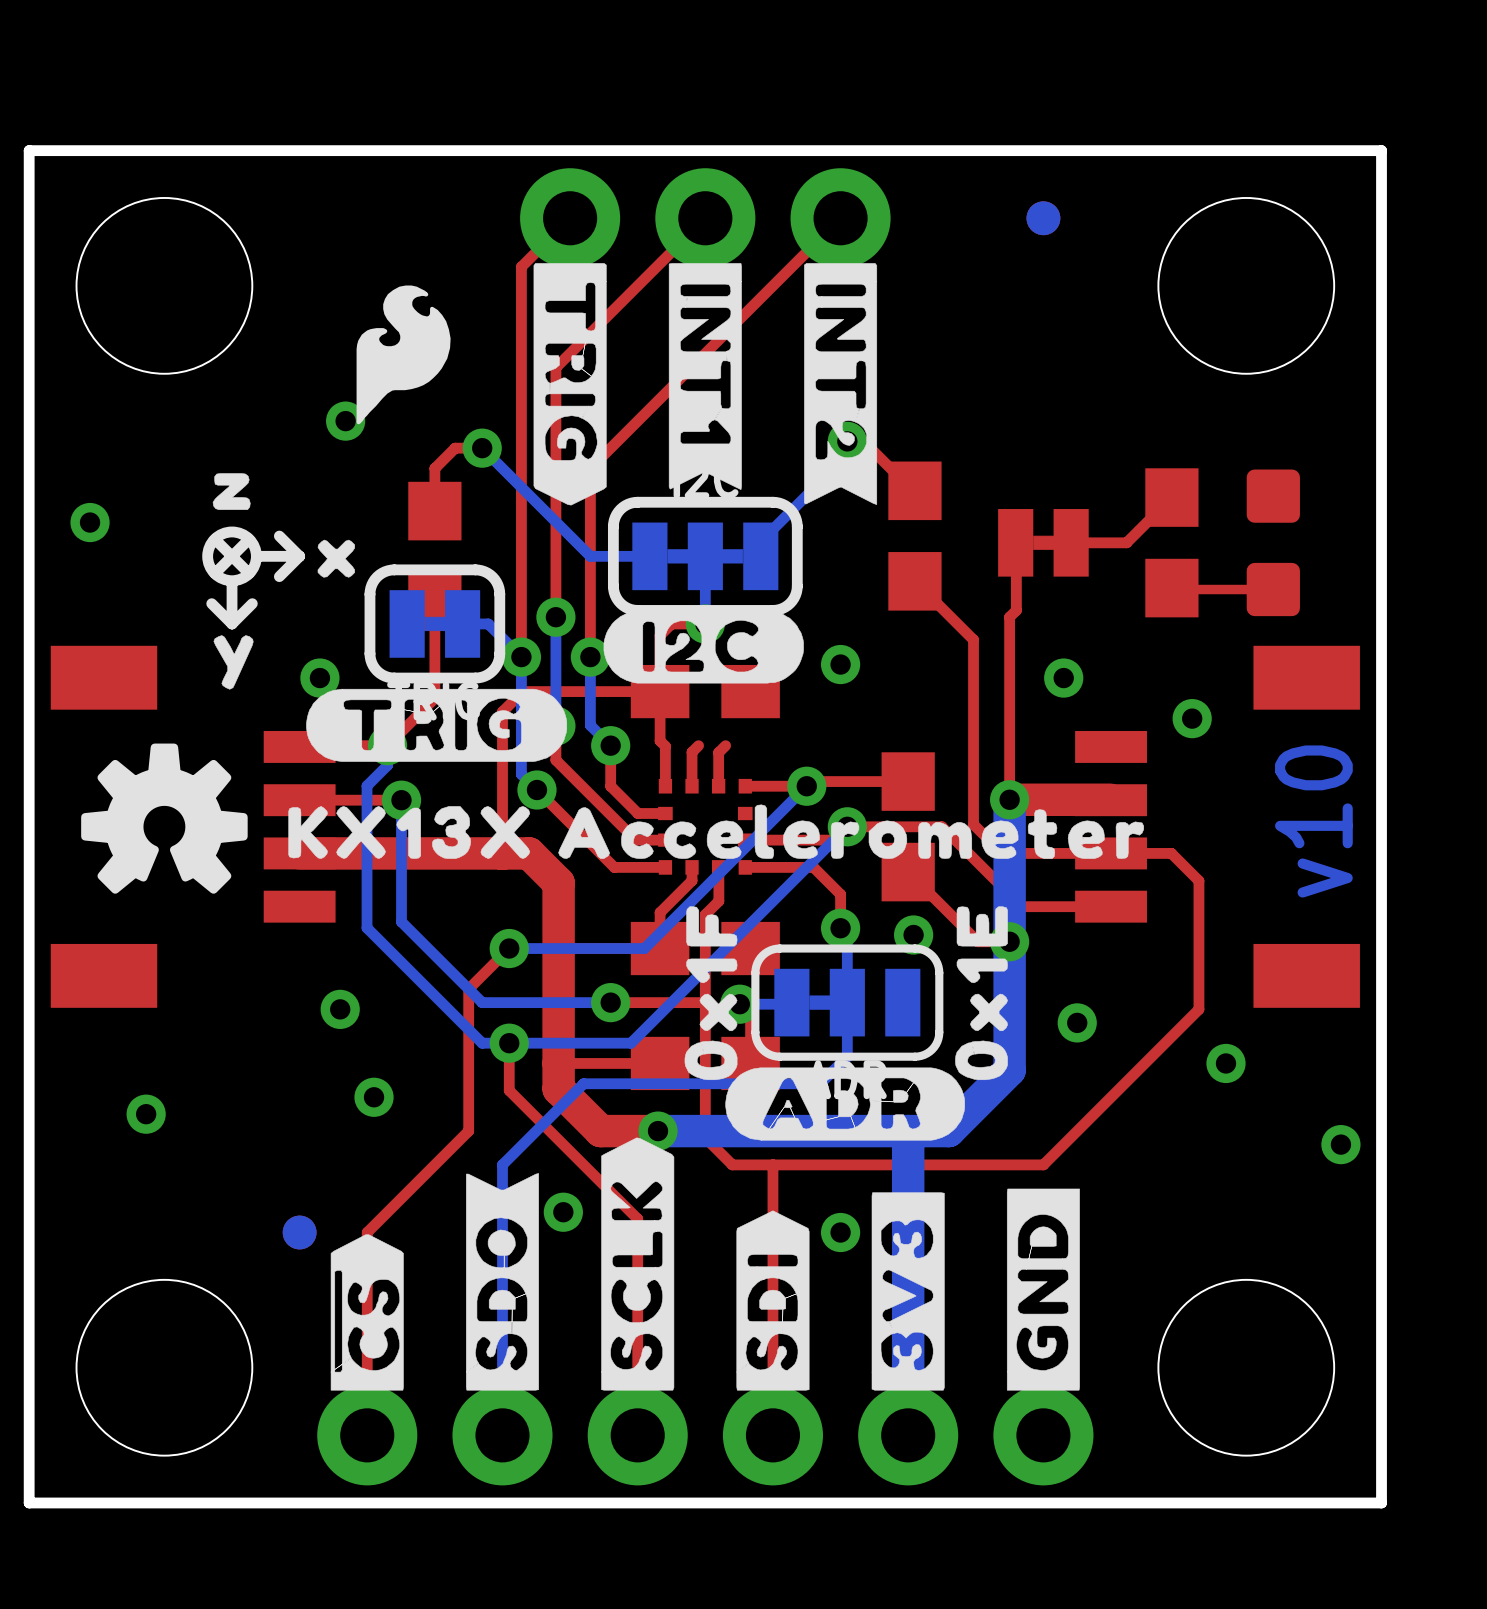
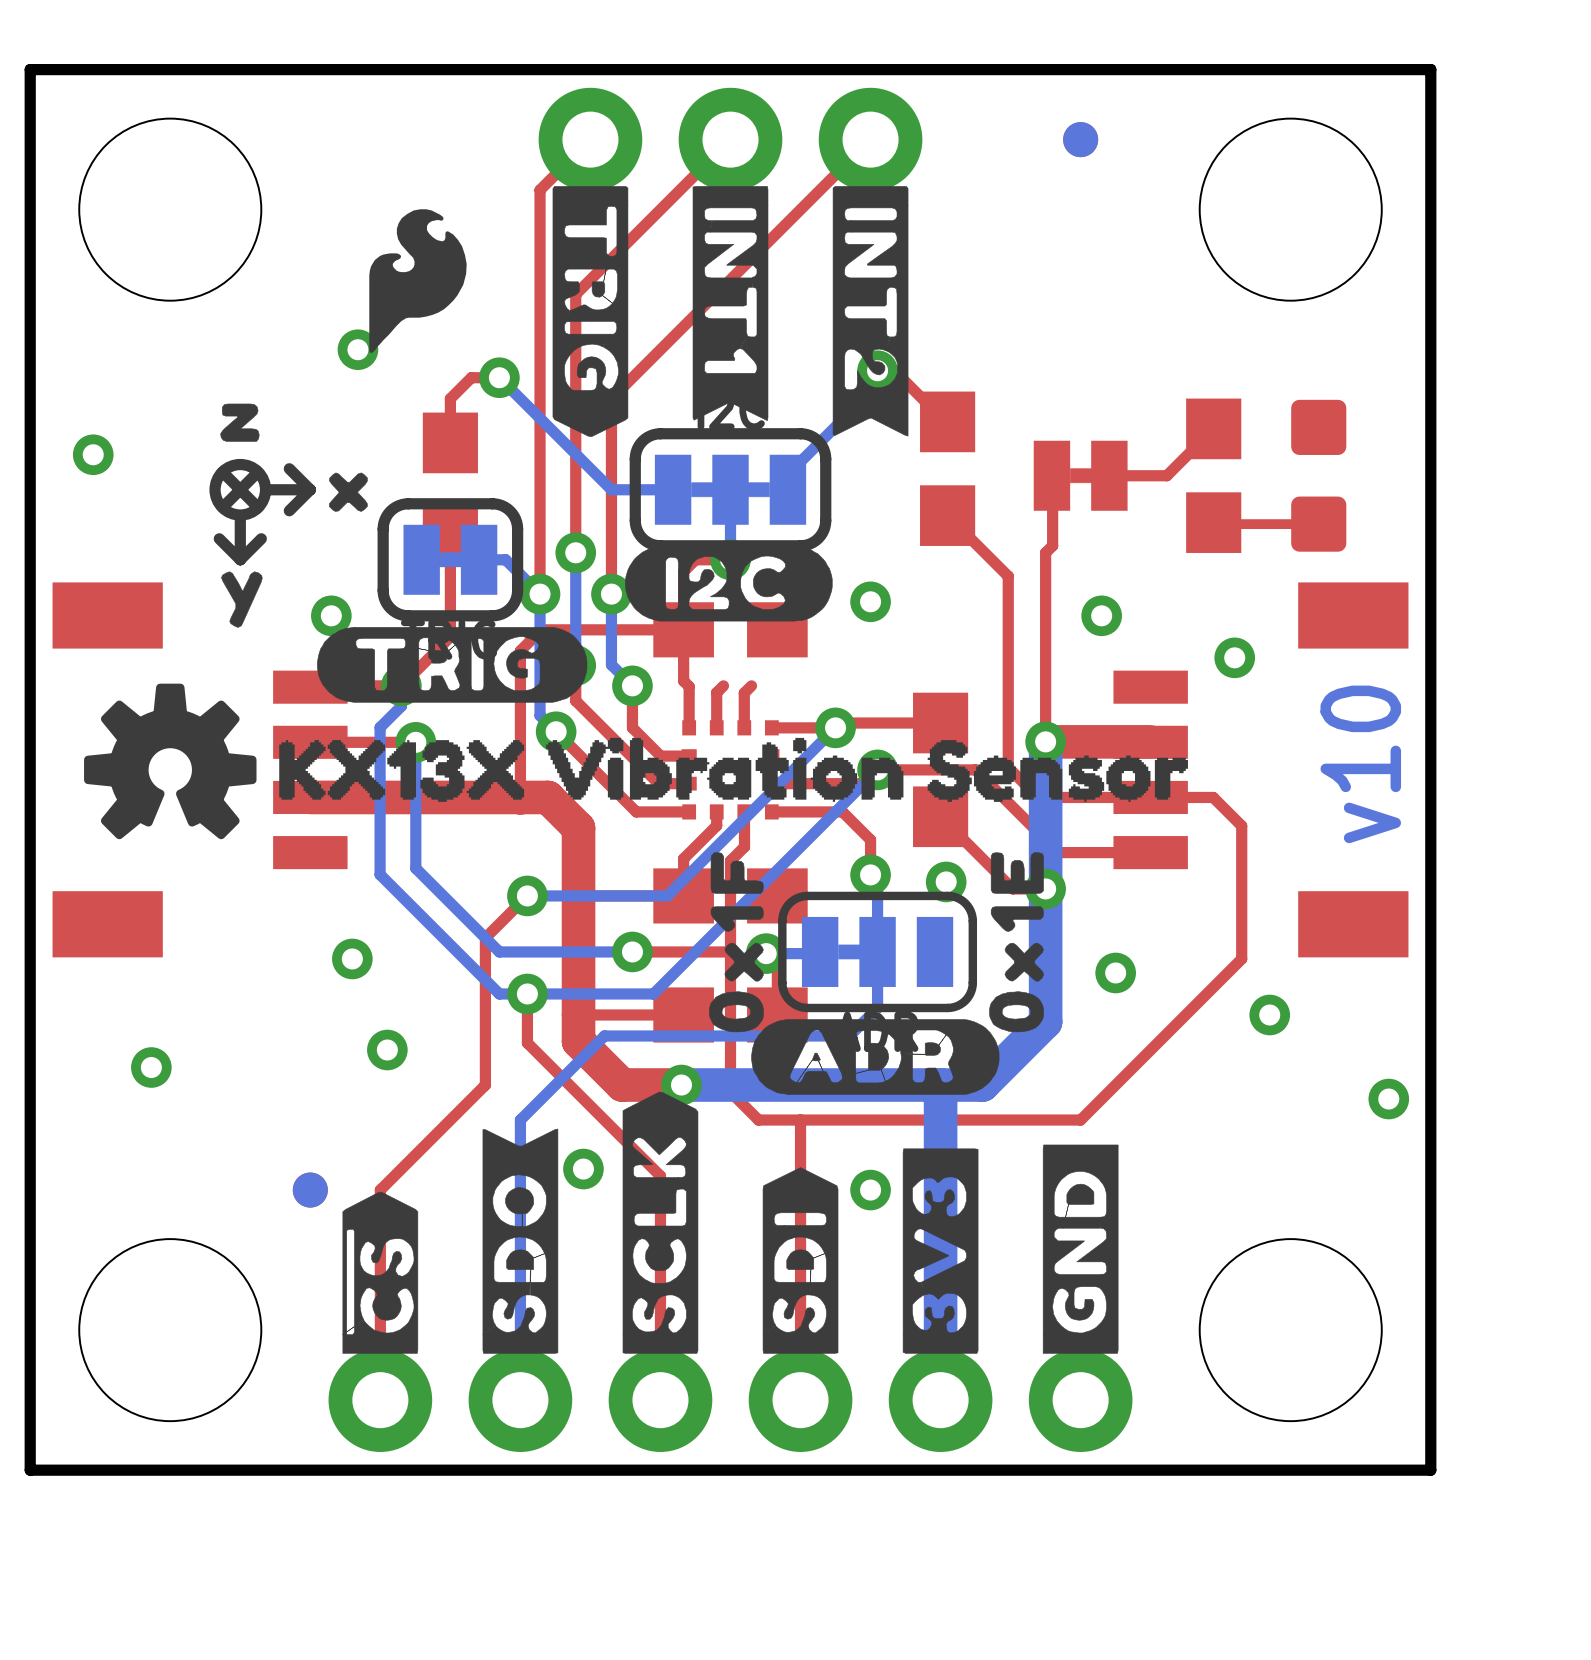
drawing shape: [288, 804, 1145, 859] -> [279, 737, 1188, 802]

